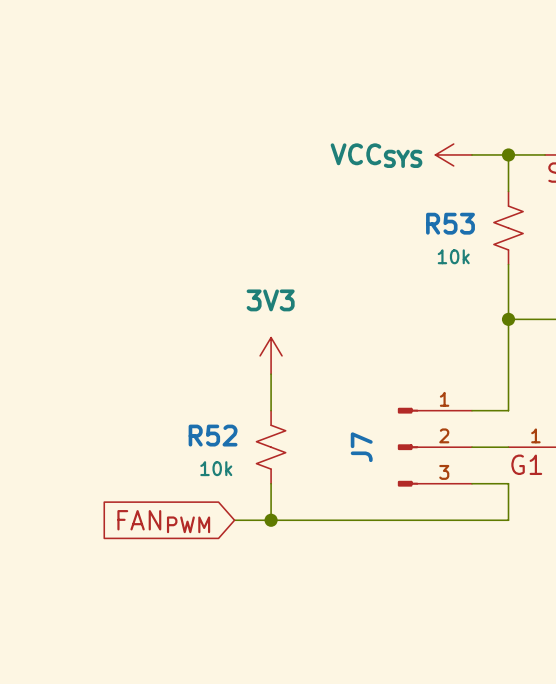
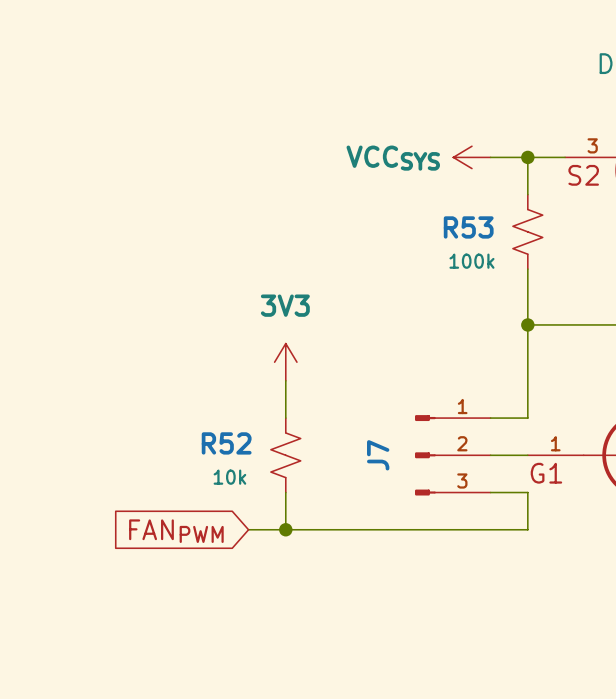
R53 value: 10k (453, 256) -> 100k (471, 261)

